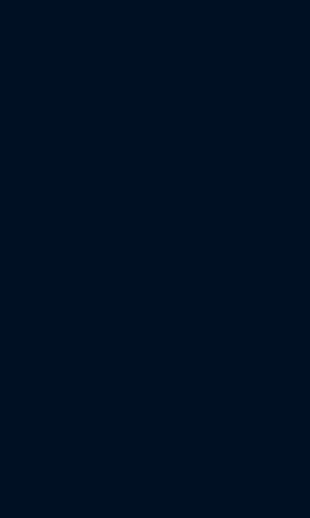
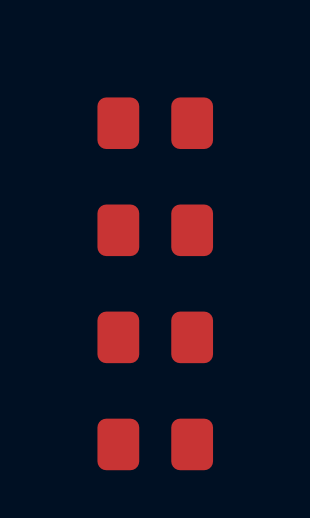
part: none -> (155, 123)
part: none -> (155, 230)
part: none -> (155, 337)
part: none -> (155, 444)

